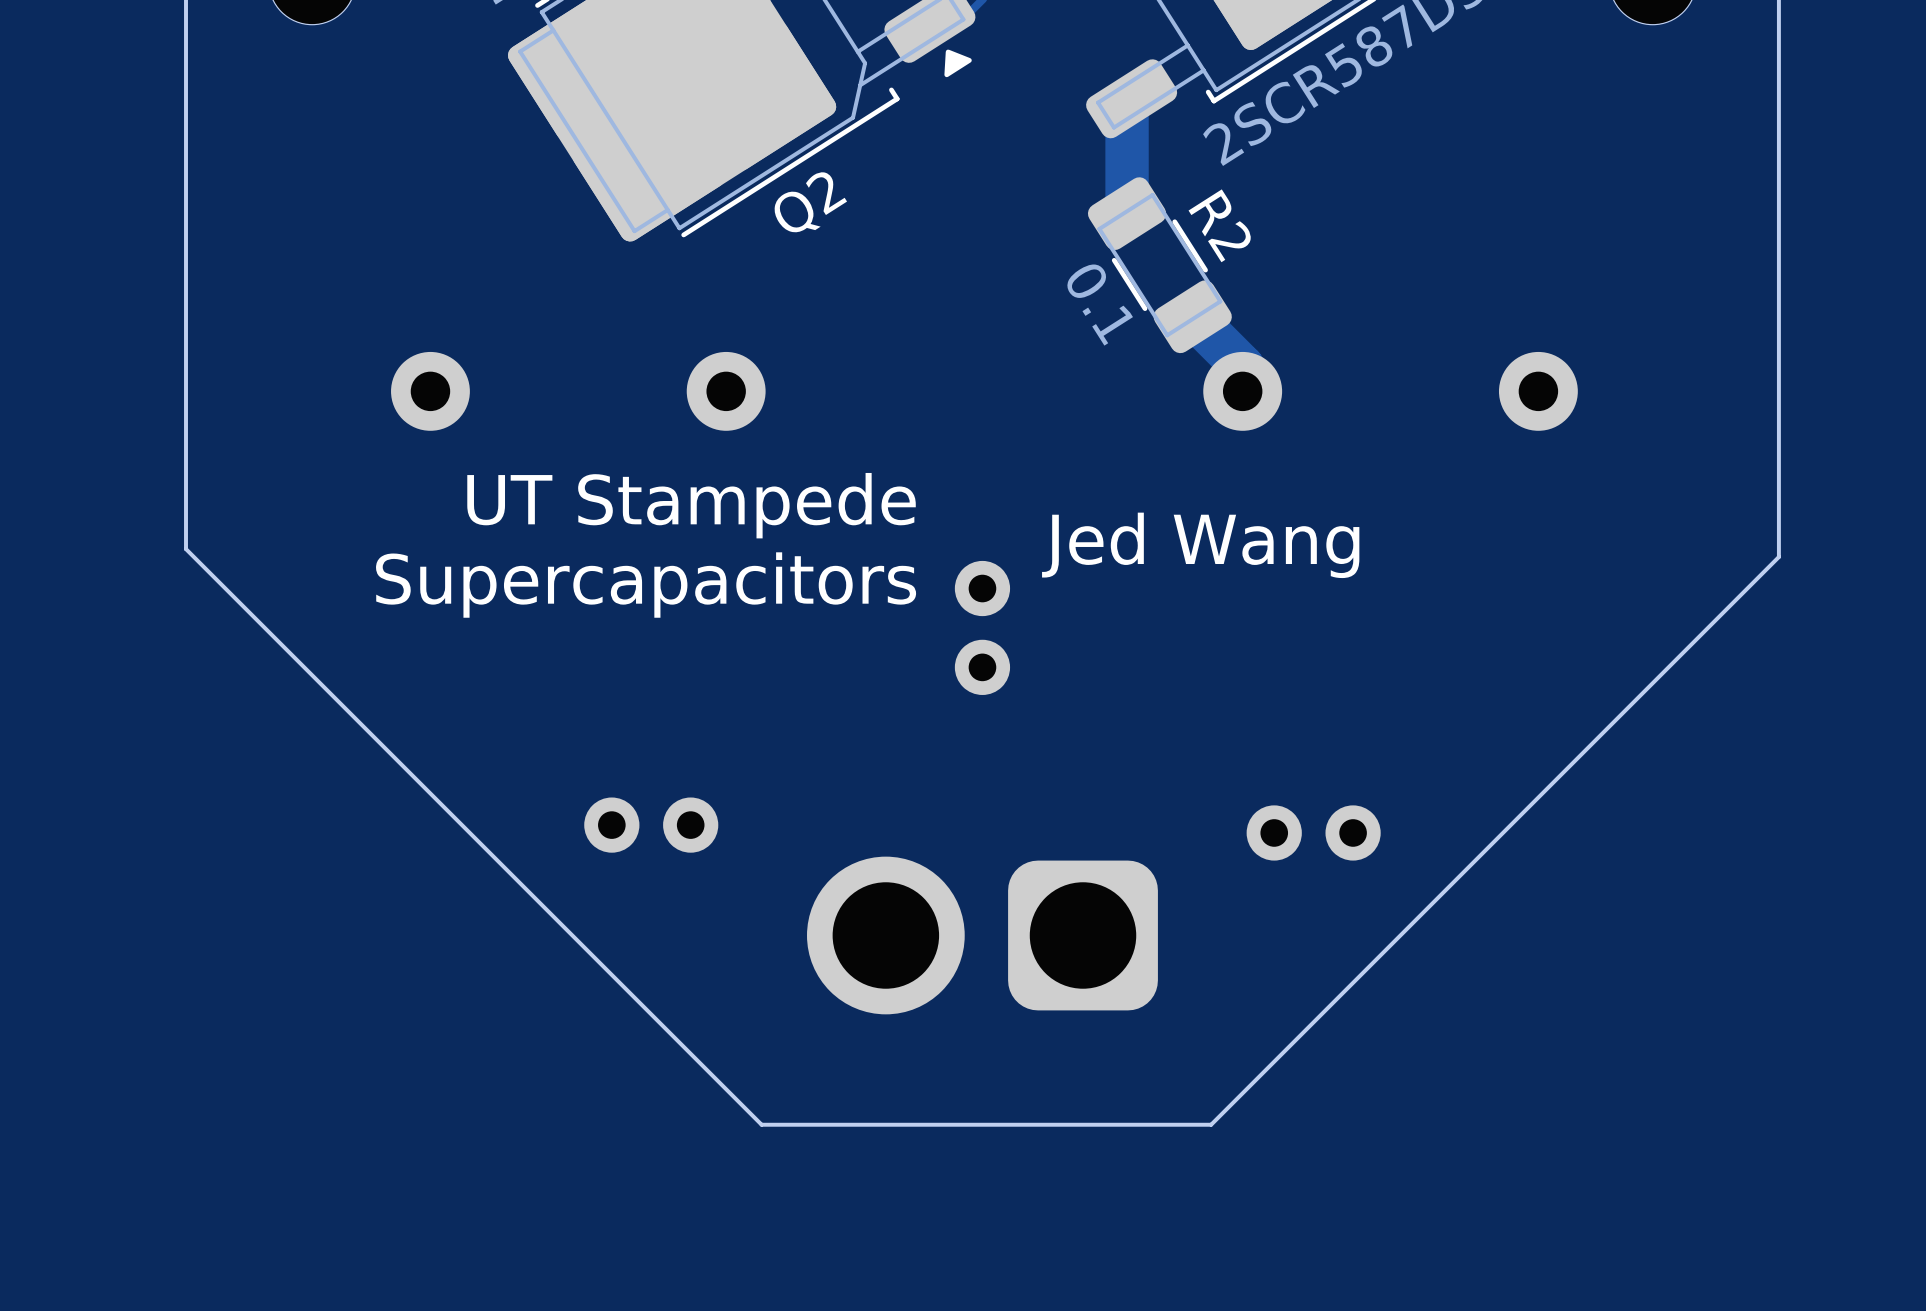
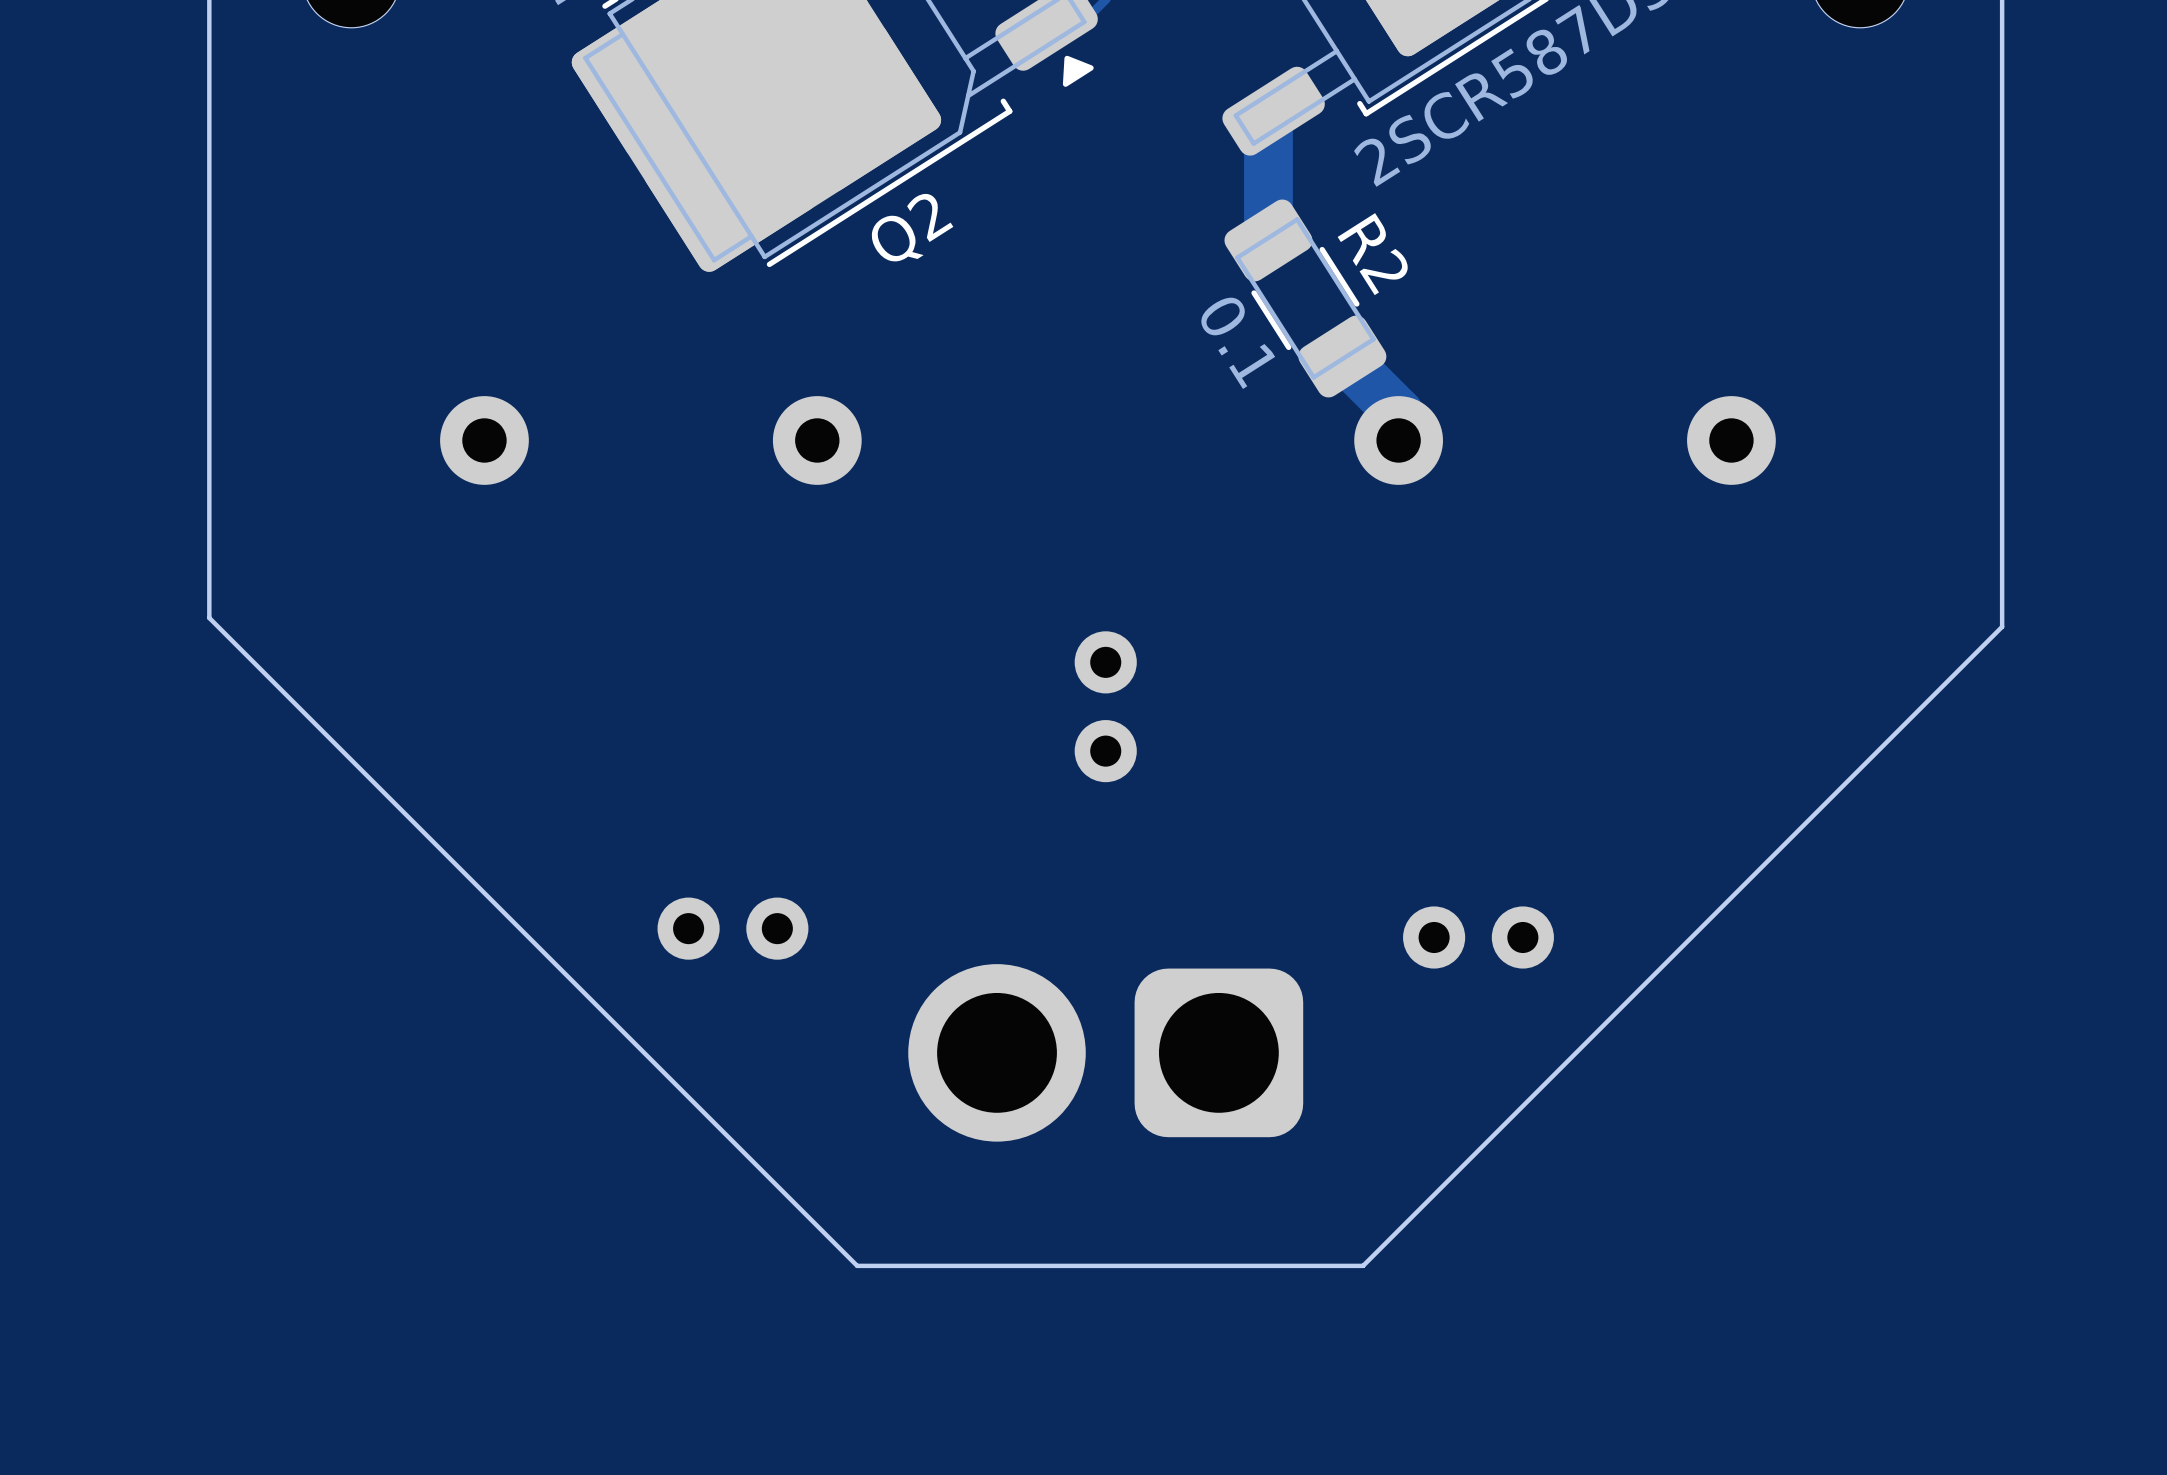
text: UT Stampede (691, 505) -> none
text: Jed Wang (1200, 545) -> none
text: Supercapacitors (646, 585) -> none

